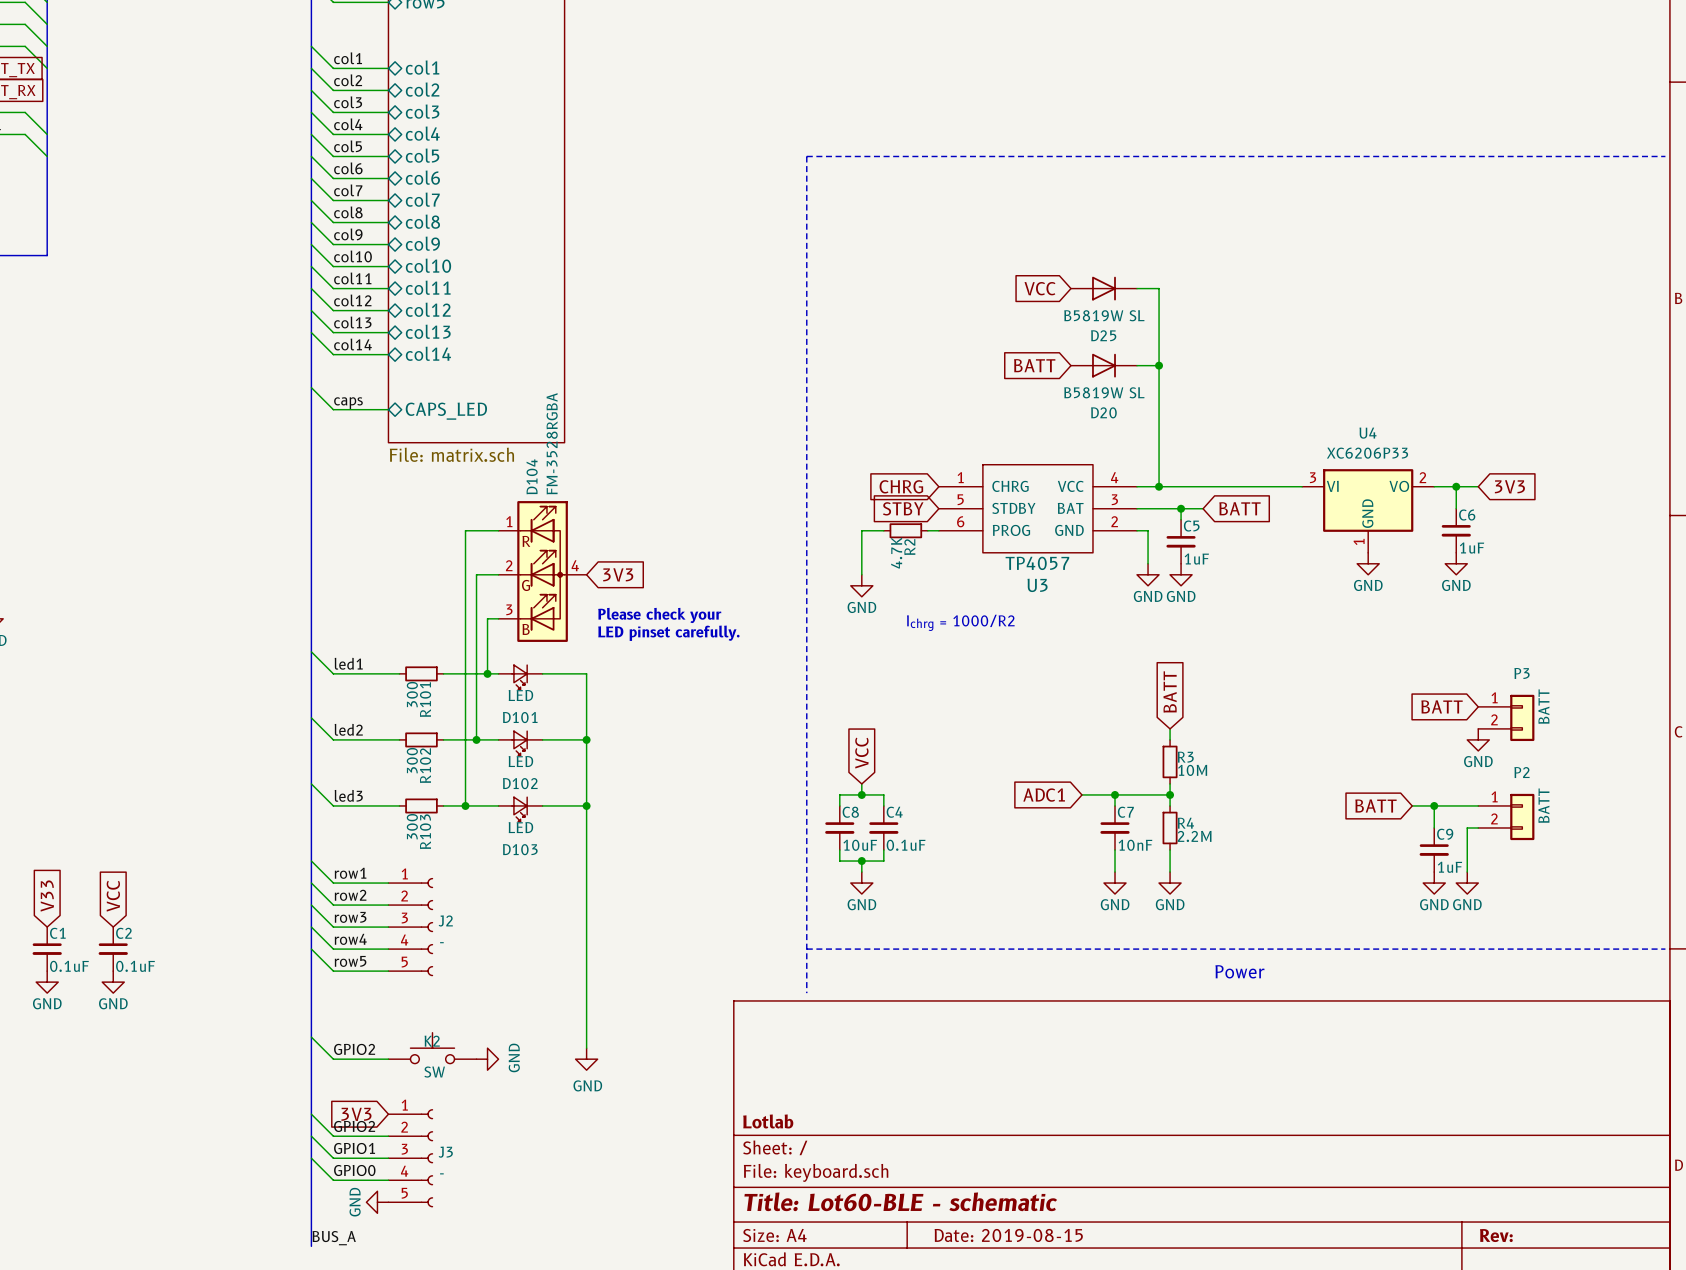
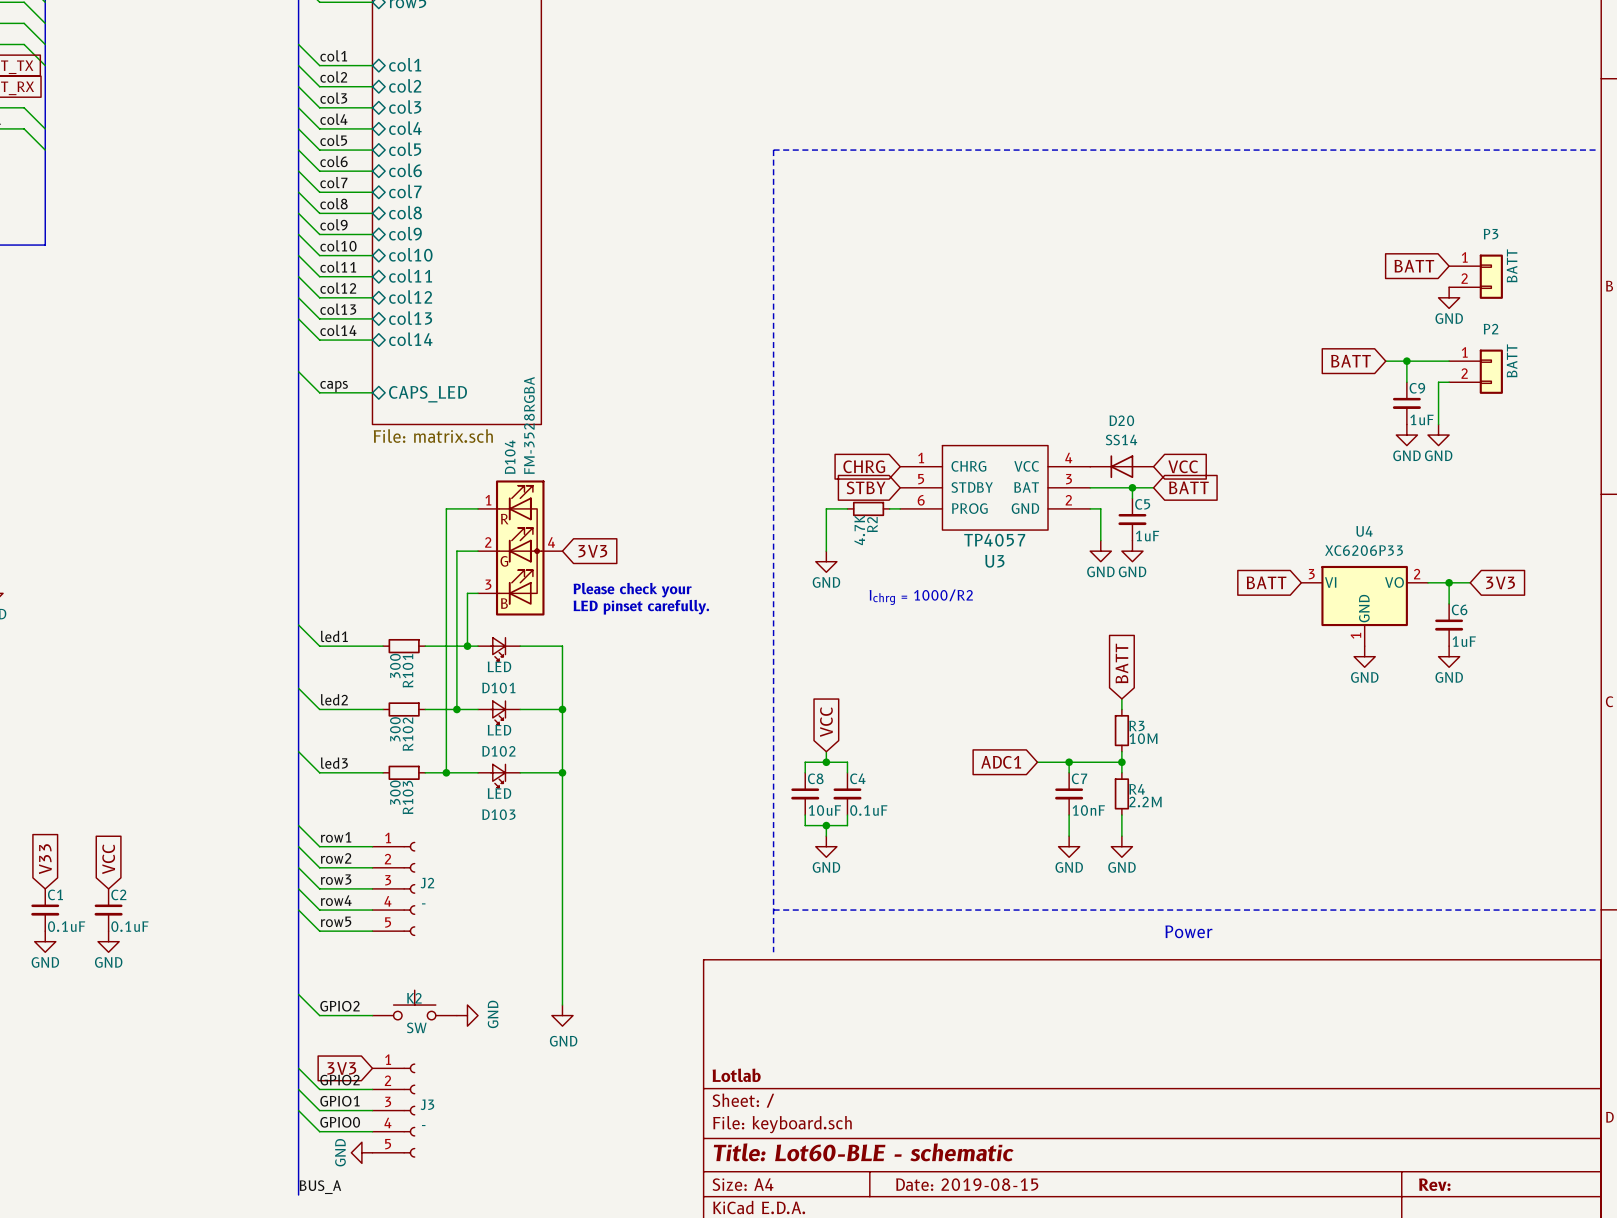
global label: none -> BATT (1414, 266)
global label: VCC (1039, 288) -> none
D25: B5819W SL (1103, 288) -> none
wire: (1137, 288) (1159, 288) (1159, 486) -> none
power symbol: none -> GND (1449, 297)
global label: BATT (1034, 365) -> none
D20 rotation: 0° (1103, 365) -> 180° (1121, 466)
D20 position: (1103, 365) -> (1121, 466)
wire: (1137, 365) (1159, 365) -> none
junction: (1159, 365) -> none
global label: none -> BATT (1351, 361)
wire: none -> (1385, 361) (1449, 361)
wire: none -> (1406, 361) (1406, 382)
junction: none -> (1406, 361)
D20 value: B5819W SL (1104, 392) -> SS14 (1121, 439)
wire: none -> (1449, 382) (1438, 382) (1438, 424)
power symbol: none -> GND (1406, 435)
power symbol: none -> GND (1438, 435)
wire: (1137, 486) (1302, 486) -> none
junction: (1159, 486) -> none
global label: none -> VCC (1183, 466)
wire: (1434, 486) (1478, 486) -> (1428, 582) (1470, 582)
wire: (1456, 486) (1456, 508) -> (1449, 582) (1449, 603)
junction: (1456, 486) -> none
global label position: 3V3 (1509, 486) -> 3V3 (1500, 582)
U4 position: (1368, 510) -> (1364, 606)
C6 position: (1456, 530) -> (1449, 625)
power symbol: GND (1368, 563) -> none
power symbol: GND (1456, 563) -> none
global label: none -> BATT (1266, 582)
junction: none -> (1449, 582)
power symbol: none -> GND (1364, 656)
power symbol: none -> GND (1449, 656)
global label: BATT (1442, 706) -> none
P3 position: (1506, 717) -> (1476, 276)
power symbol: GND (1478, 739) -> none
global label: BATT (1375, 805) -> none
wire: (1412, 805) (1478, 805) -> none
wire: (1434, 805) (1434, 827) -> none
junction: (1434, 805) -> none
P2 position: (1506, 816) -> (1476, 371)
wire: (1478, 827) (1467, 827) (1467, 872) -> none
C9 position: (1434, 850) -> (1406, 403)
power symbol: GND (1434, 883) -> none
power symbol: GND (1467, 883) -> none

